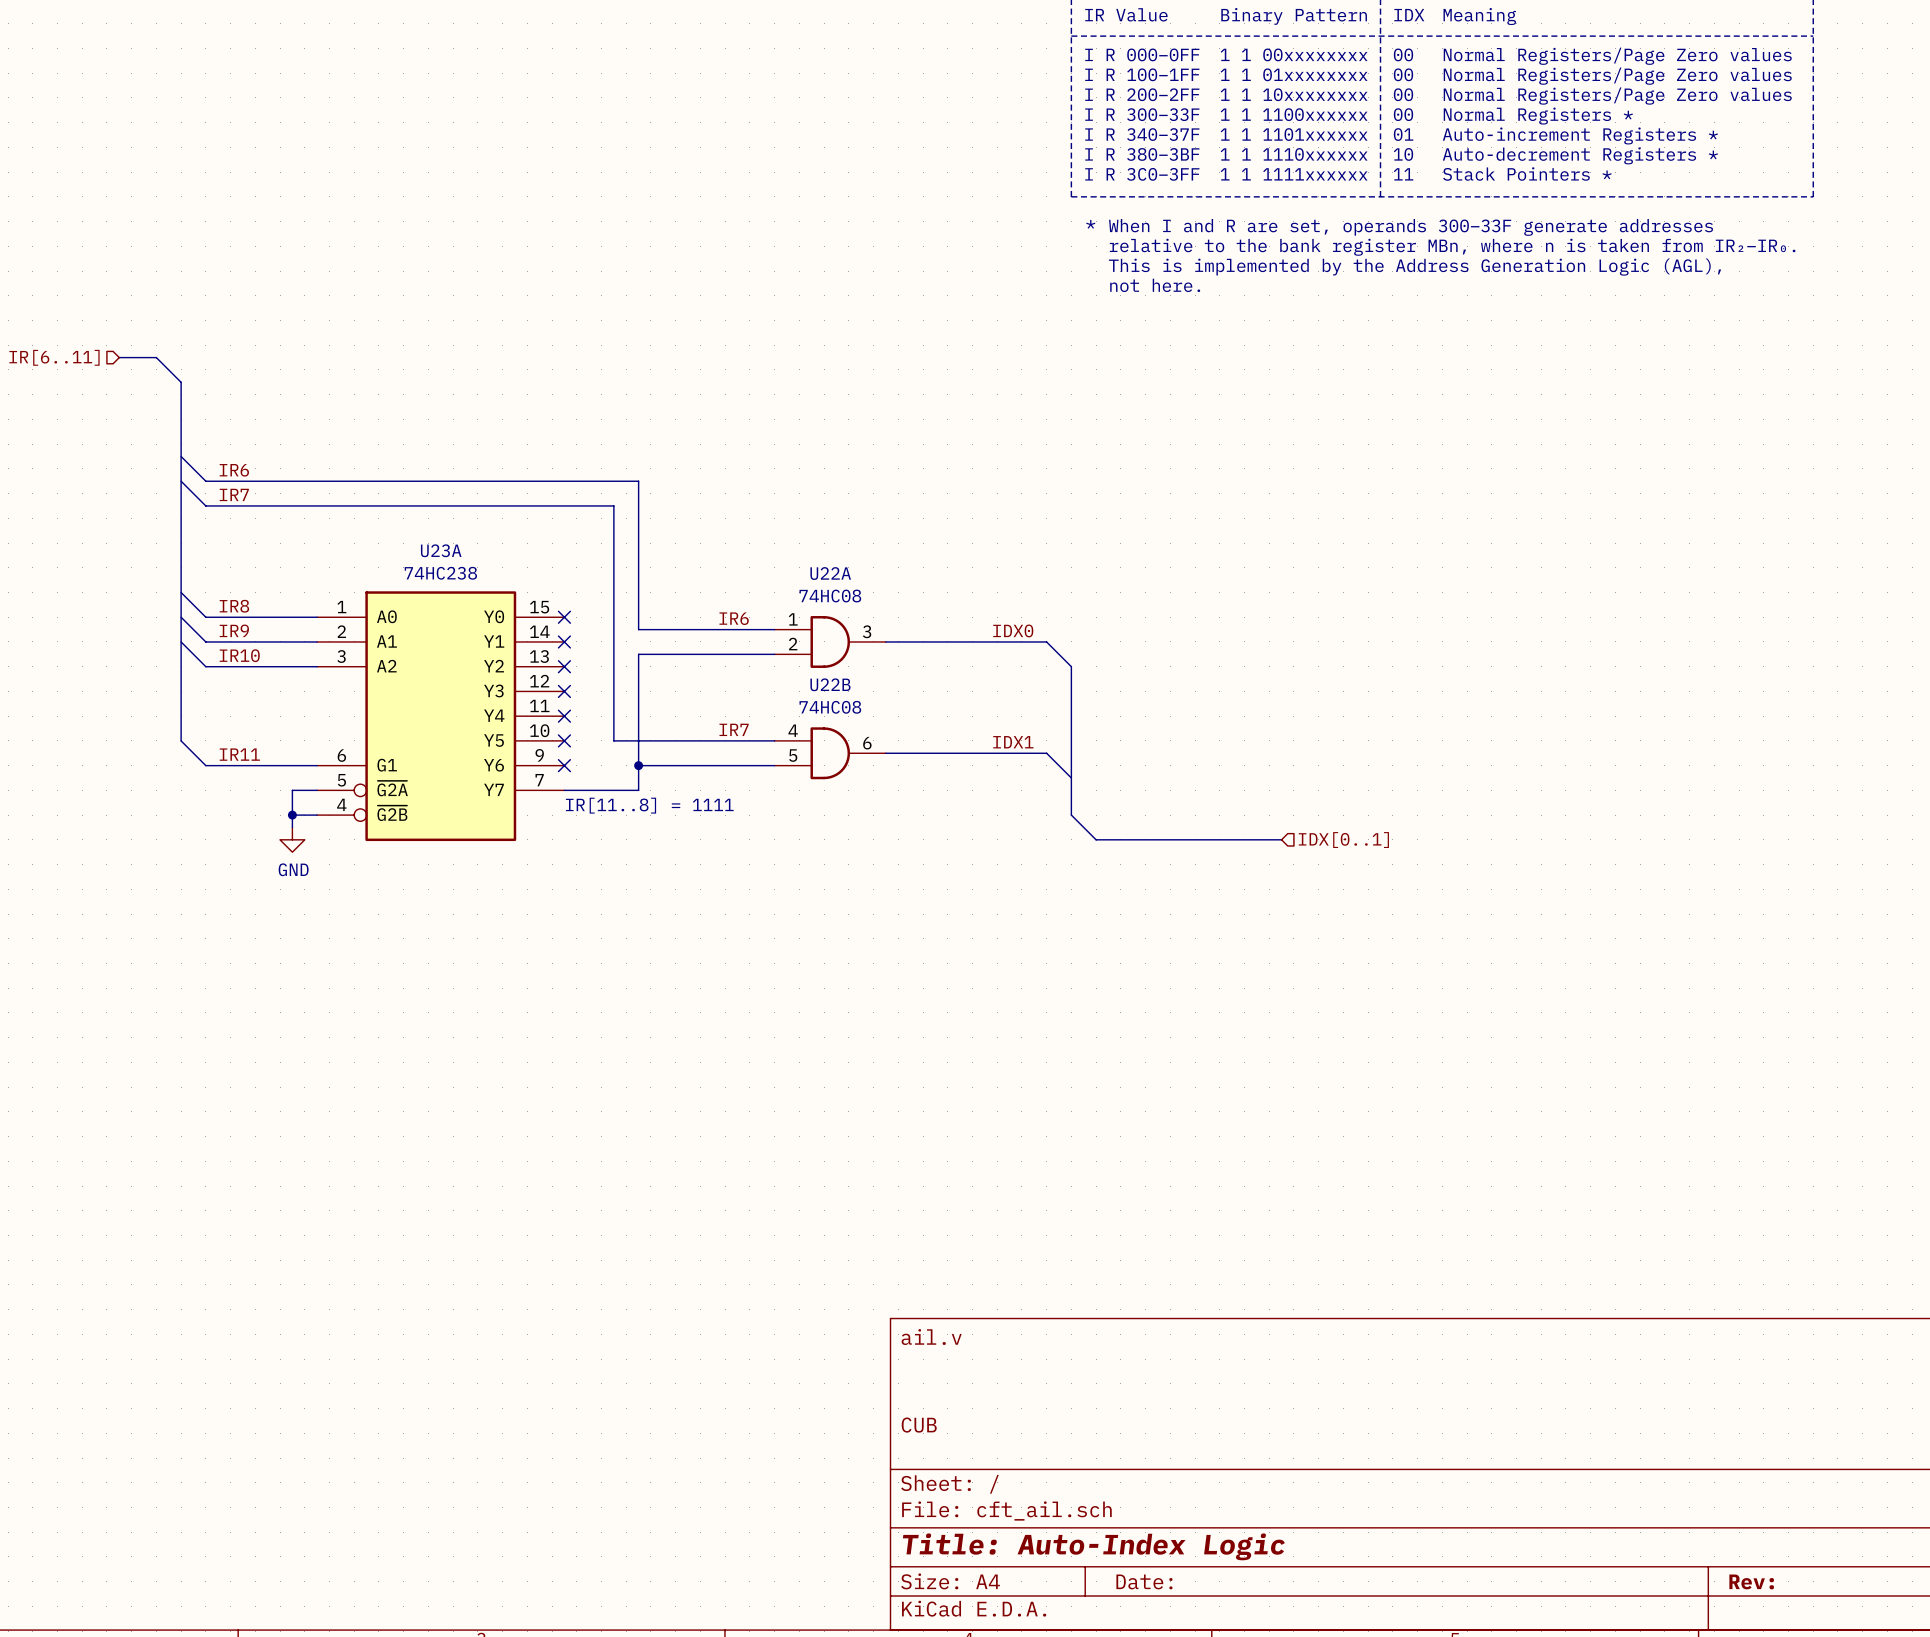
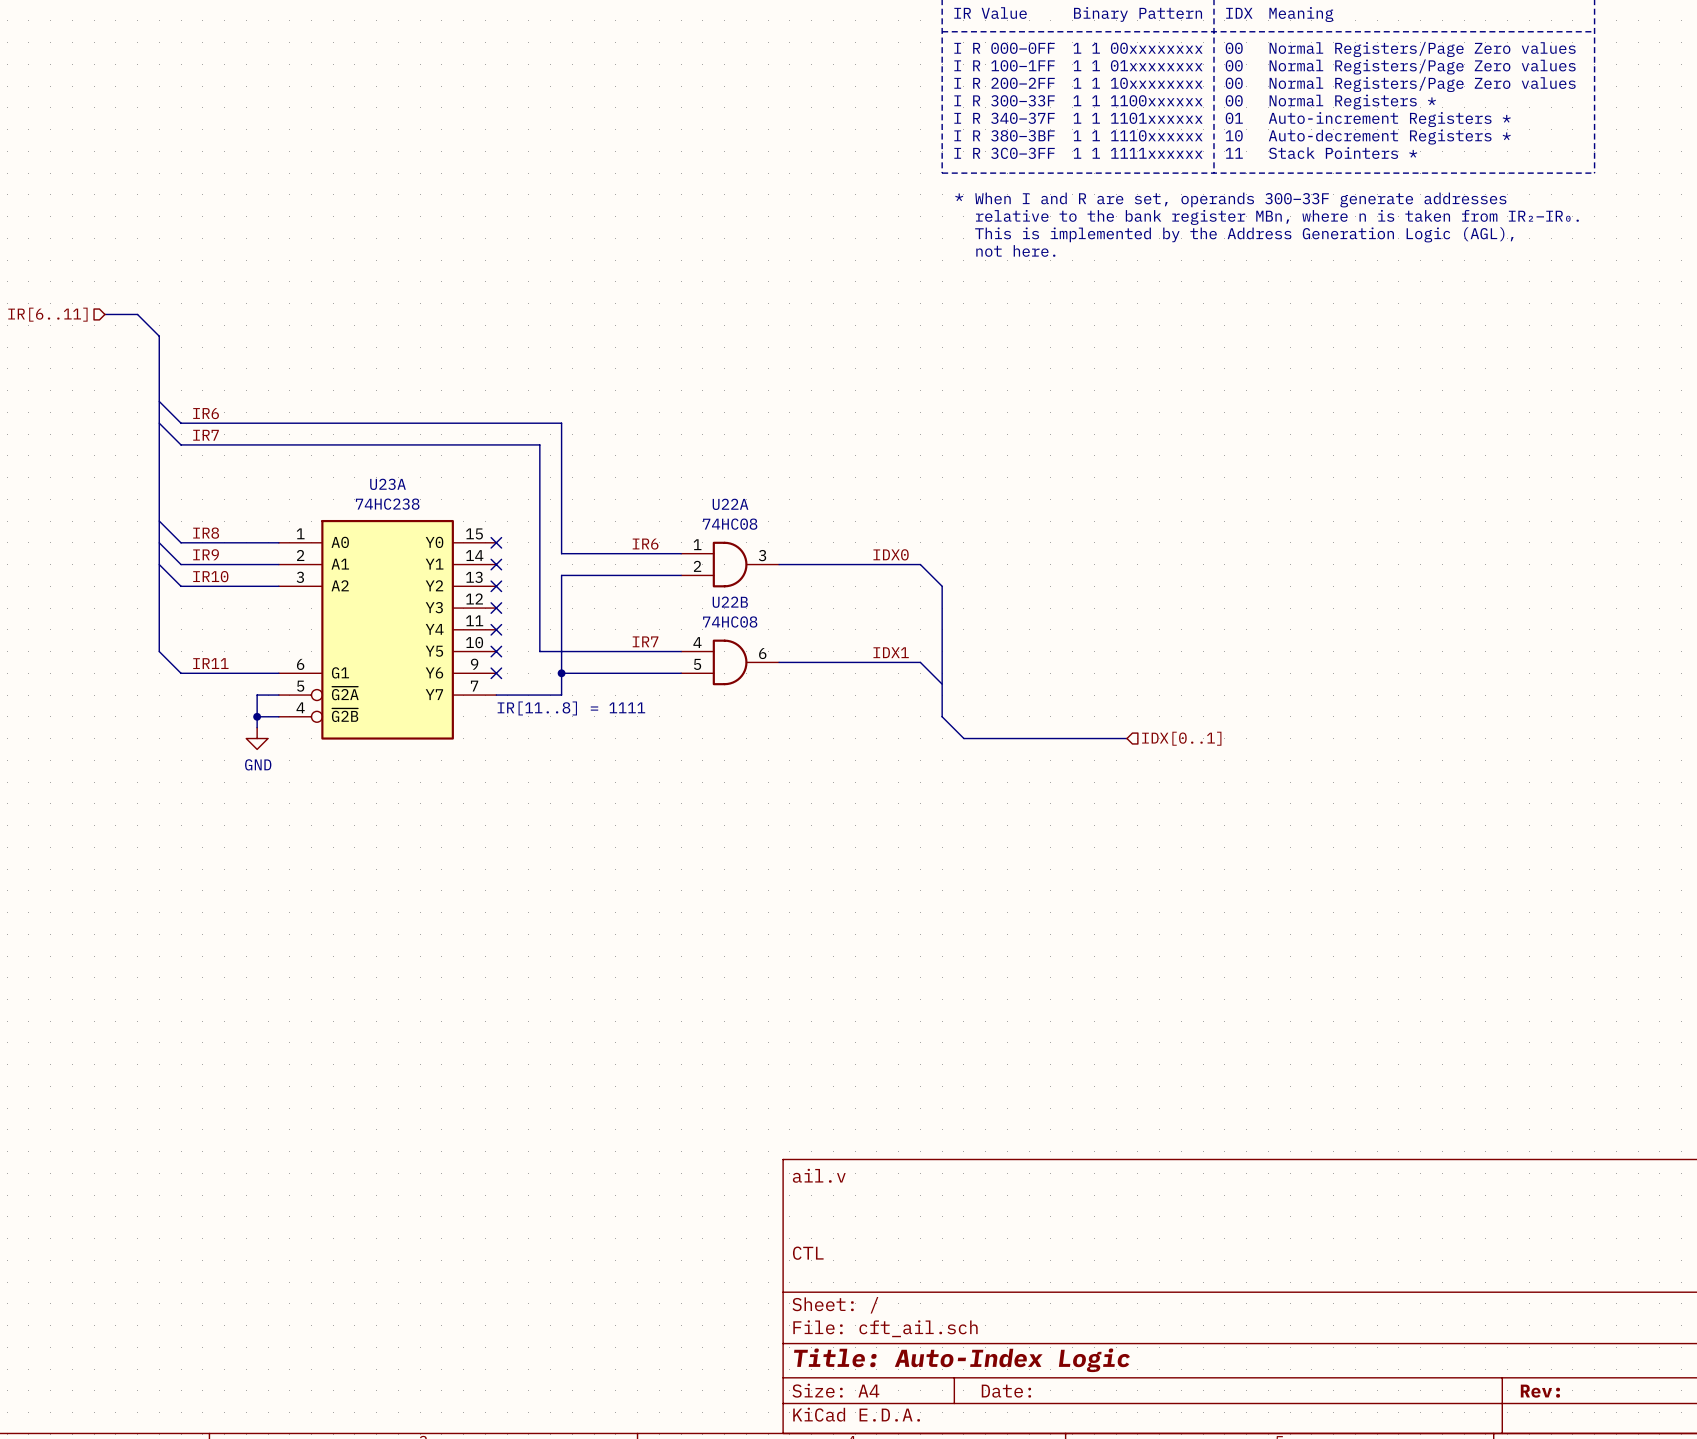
title block: CUB (919, 1425) -> CTL (808, 1253)

